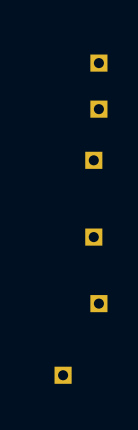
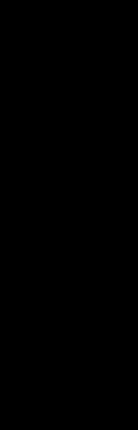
part: (98, 63) -> none
part: (98, 109) -> none
part: (93, 160) -> none
part: (93, 237) -> none
part: (98, 303) -> none
part: (63, 375) -> none

